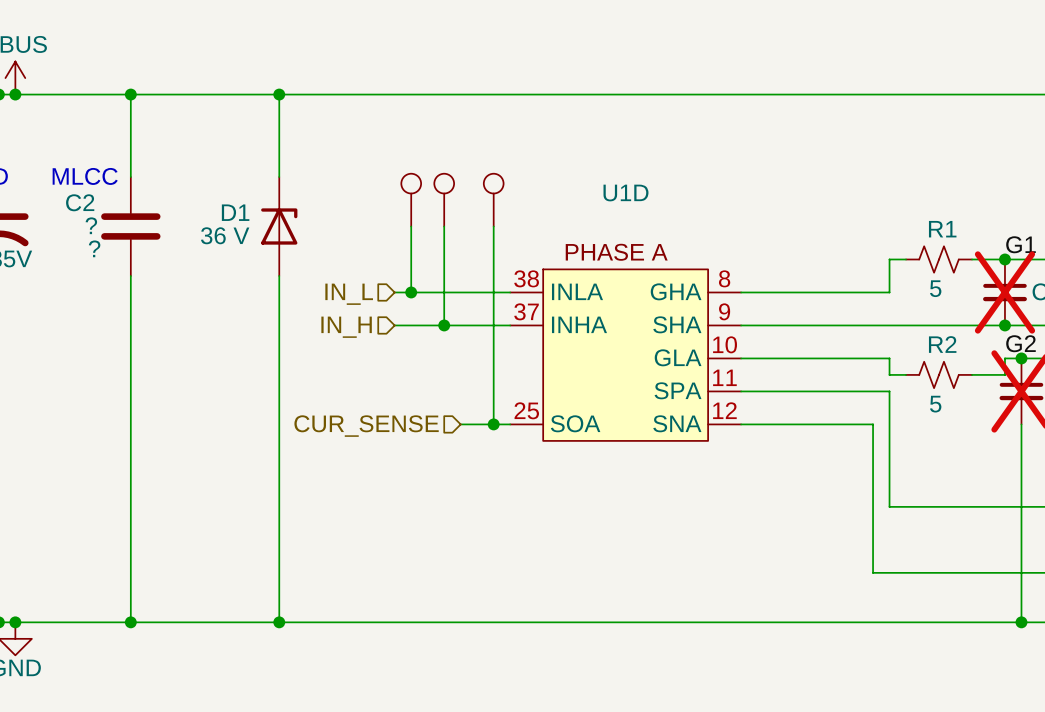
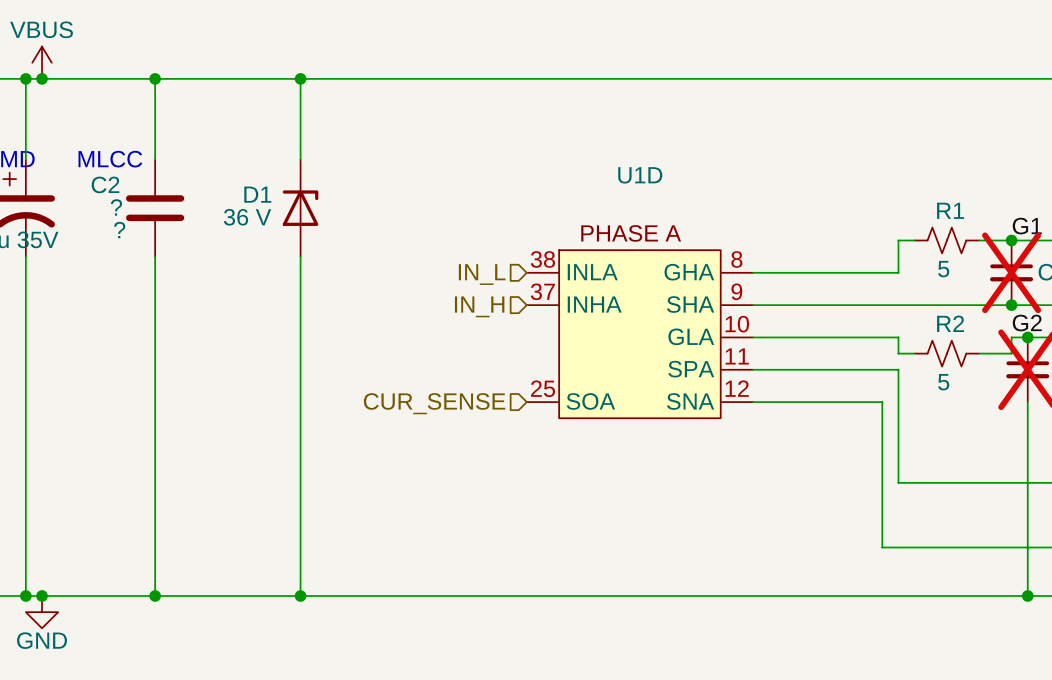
part: (411, 200) -> none
part: (444, 200) -> none
part: (493, 200) -> none
wire: (411, 226) (411, 292) -> none
wire: (444, 226) (444, 325) -> none
wire: (493, 226) (493, 424) -> none
wire: (394, 292) (510, 292) -> none
junction: (411, 292) -> none
hierarchical label position: IN_L (349, 294) -> IN_L (482, 274)
wire: (394, 325) (510, 325) -> none
junction: (444, 325) -> none
hierarchical label position: IN_H (346, 327) -> IN_H (479, 306)
wire: (460, 424) (510, 424) -> none
junction: (493, 424) -> none
hierarchical label position: CUR_SENSE (366, 426) -> CUR_SENSE (434, 403)

